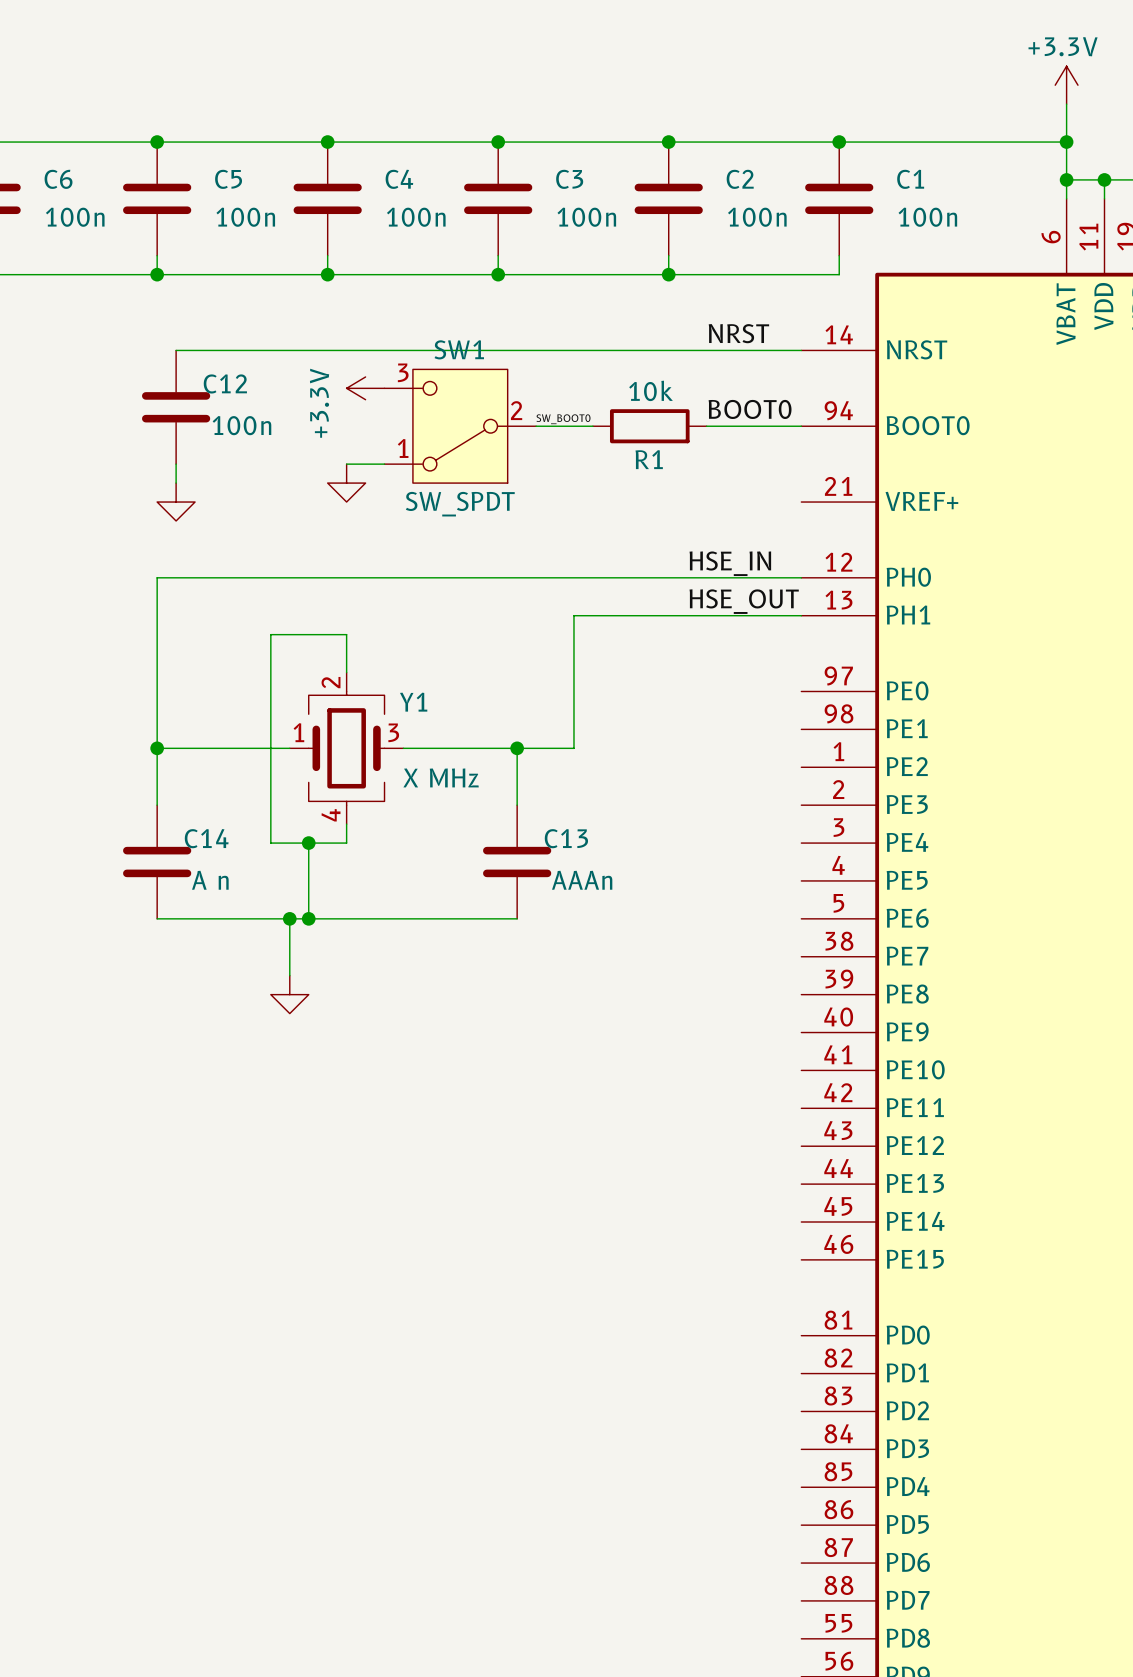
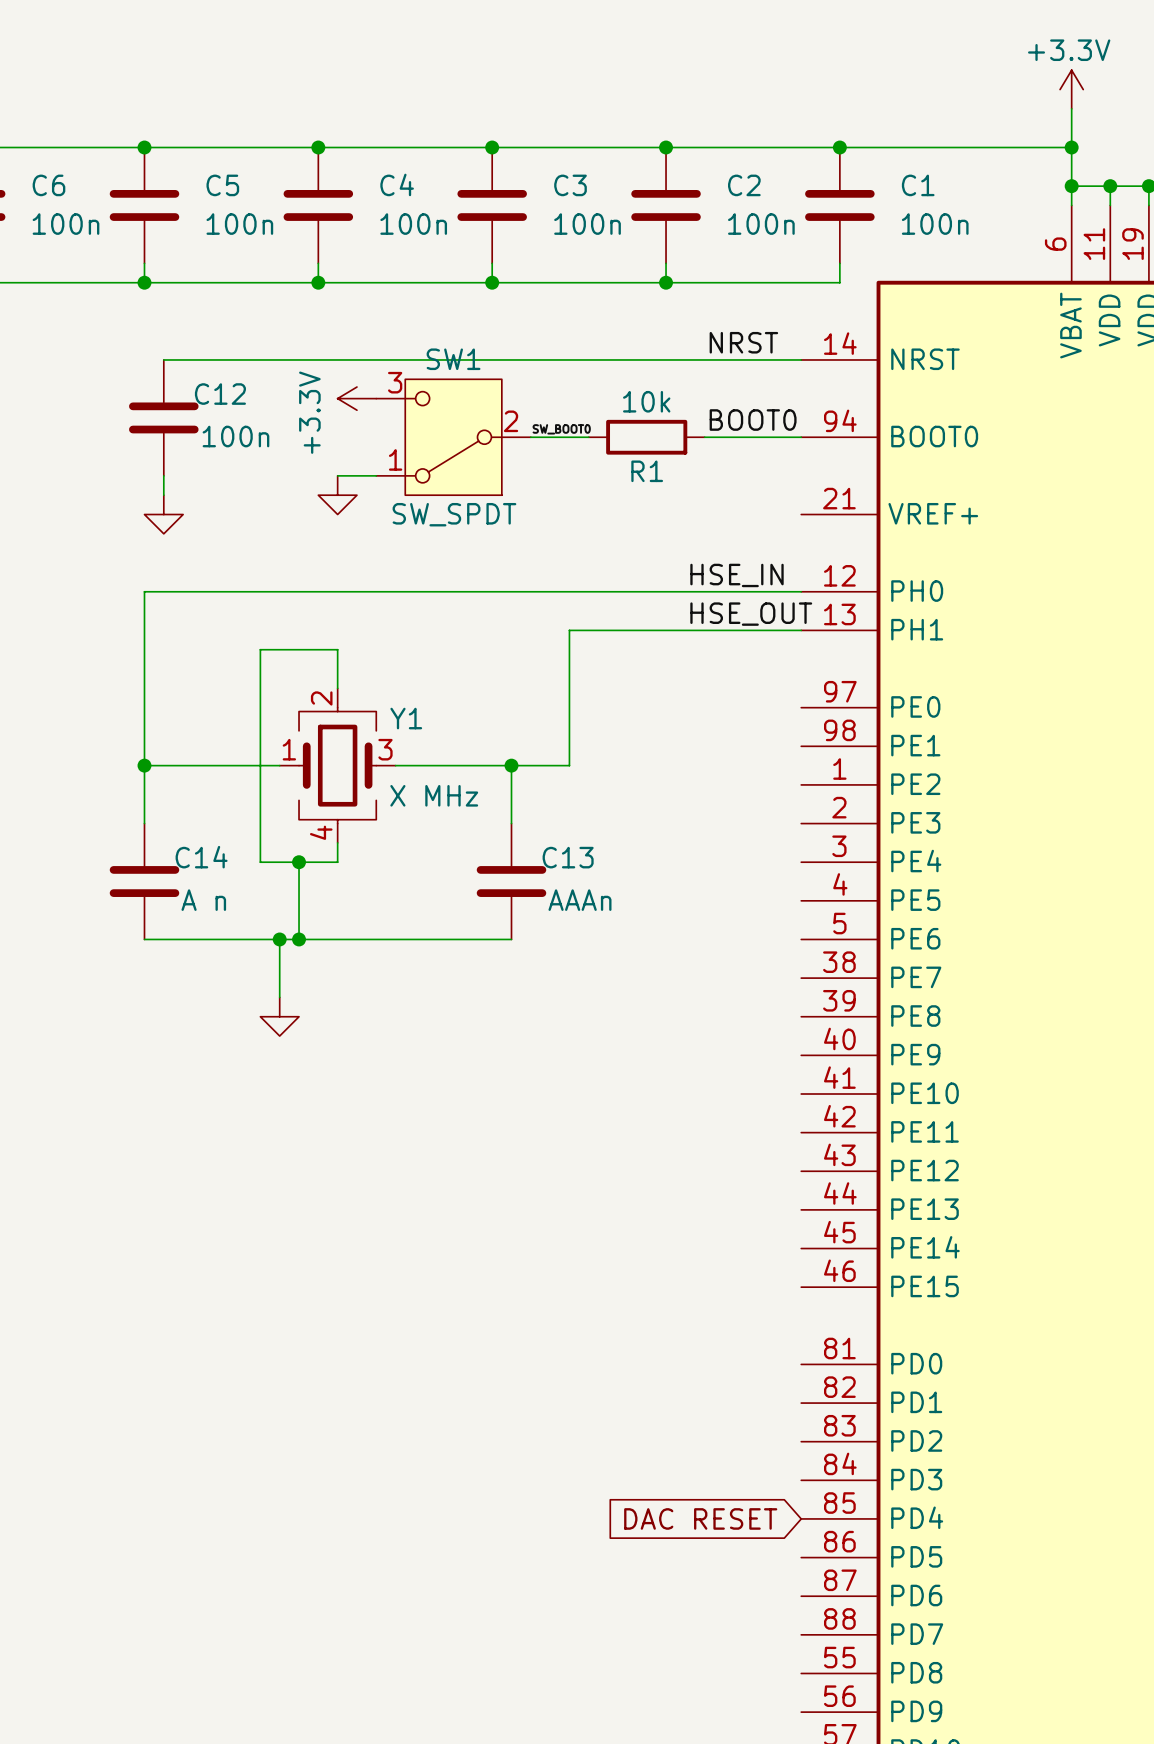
global label: none -> DAC RESET (700, 1518)

